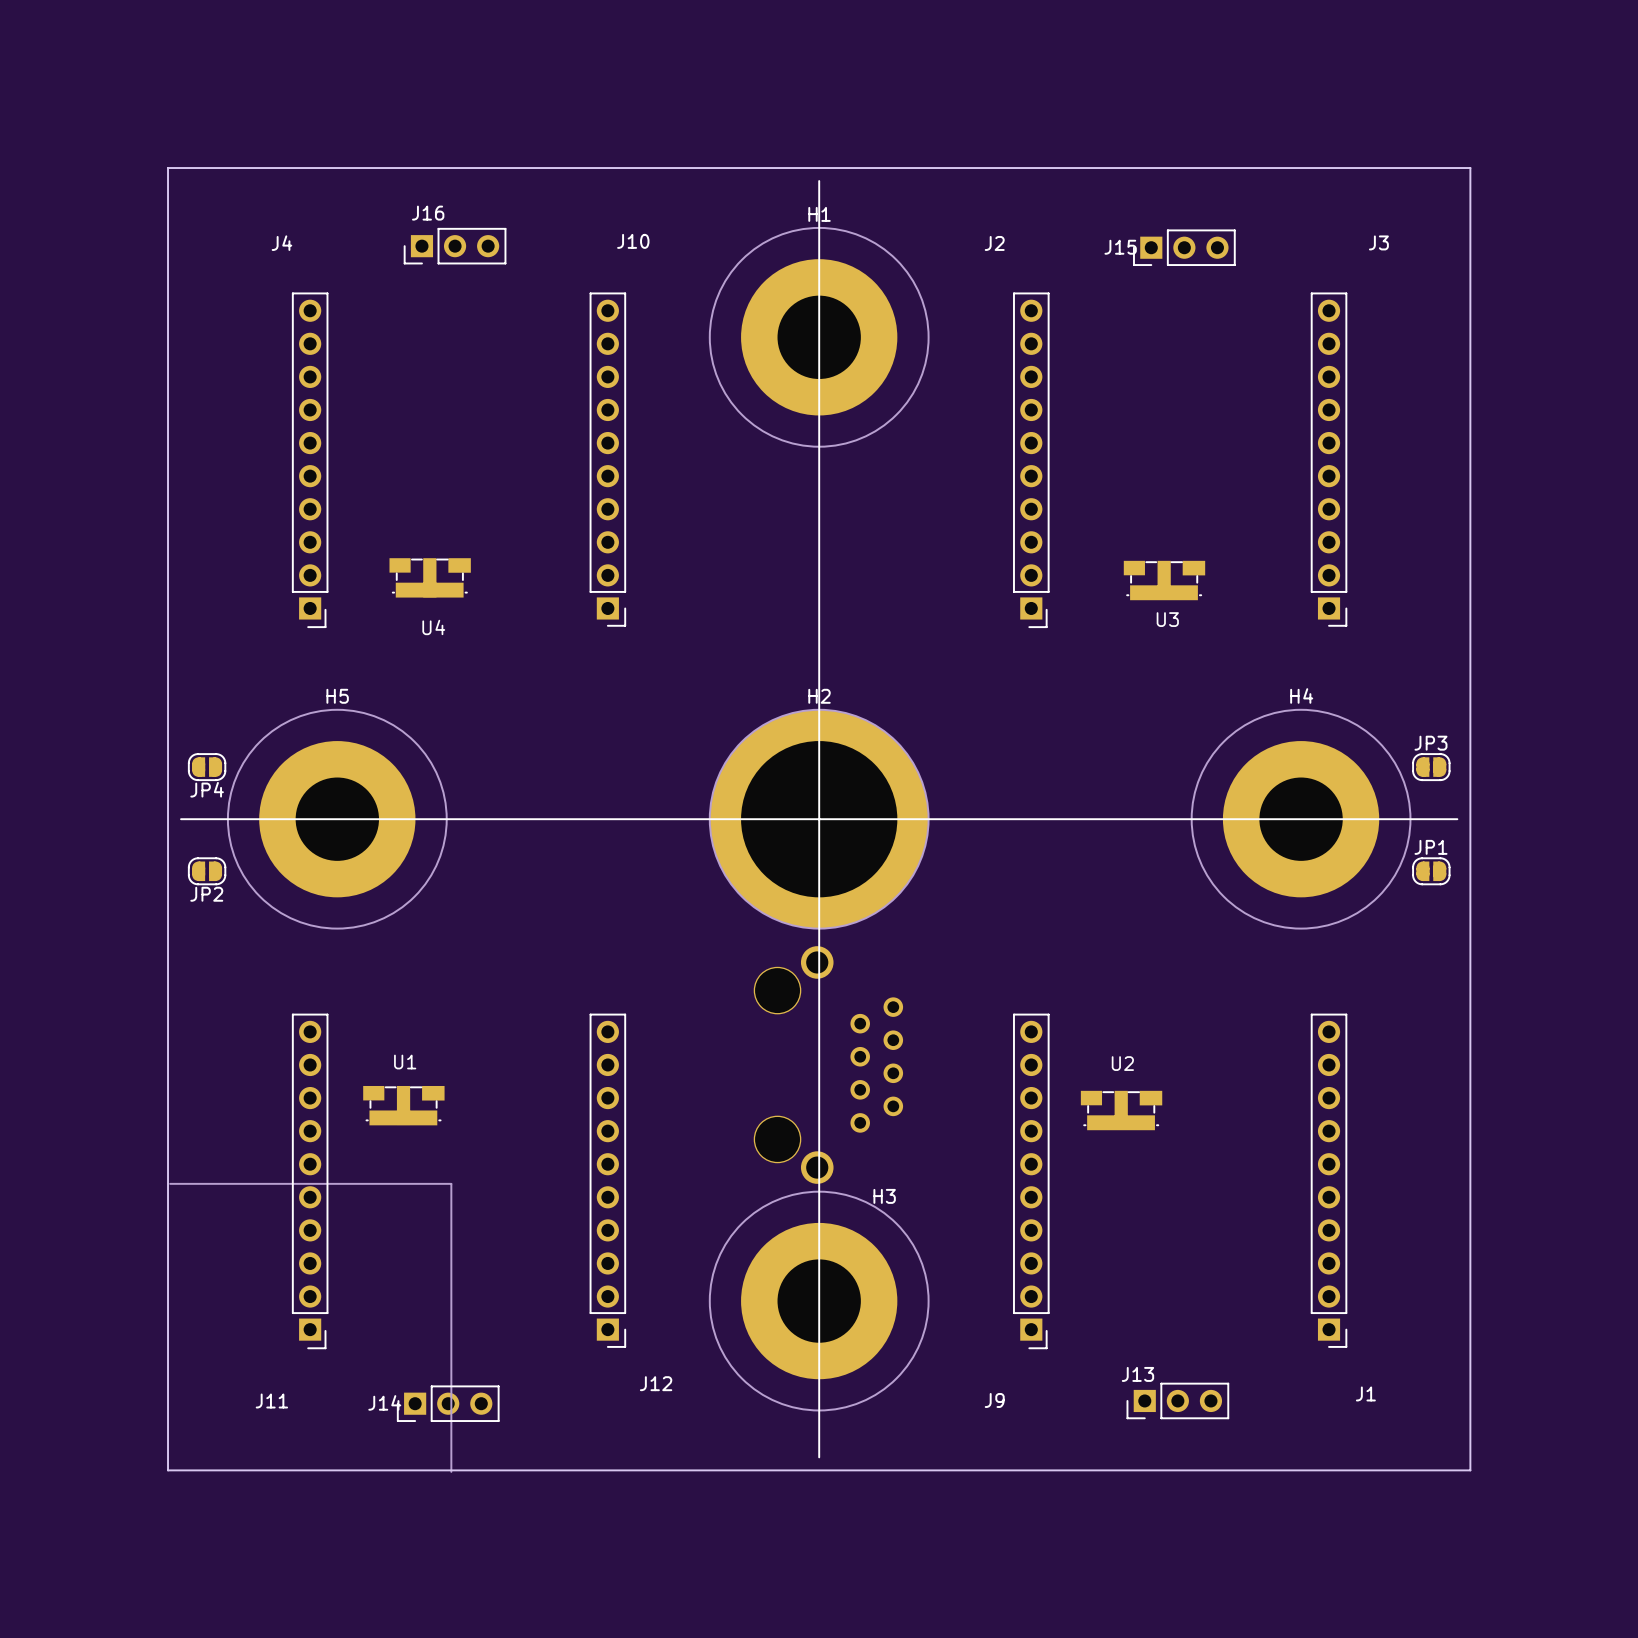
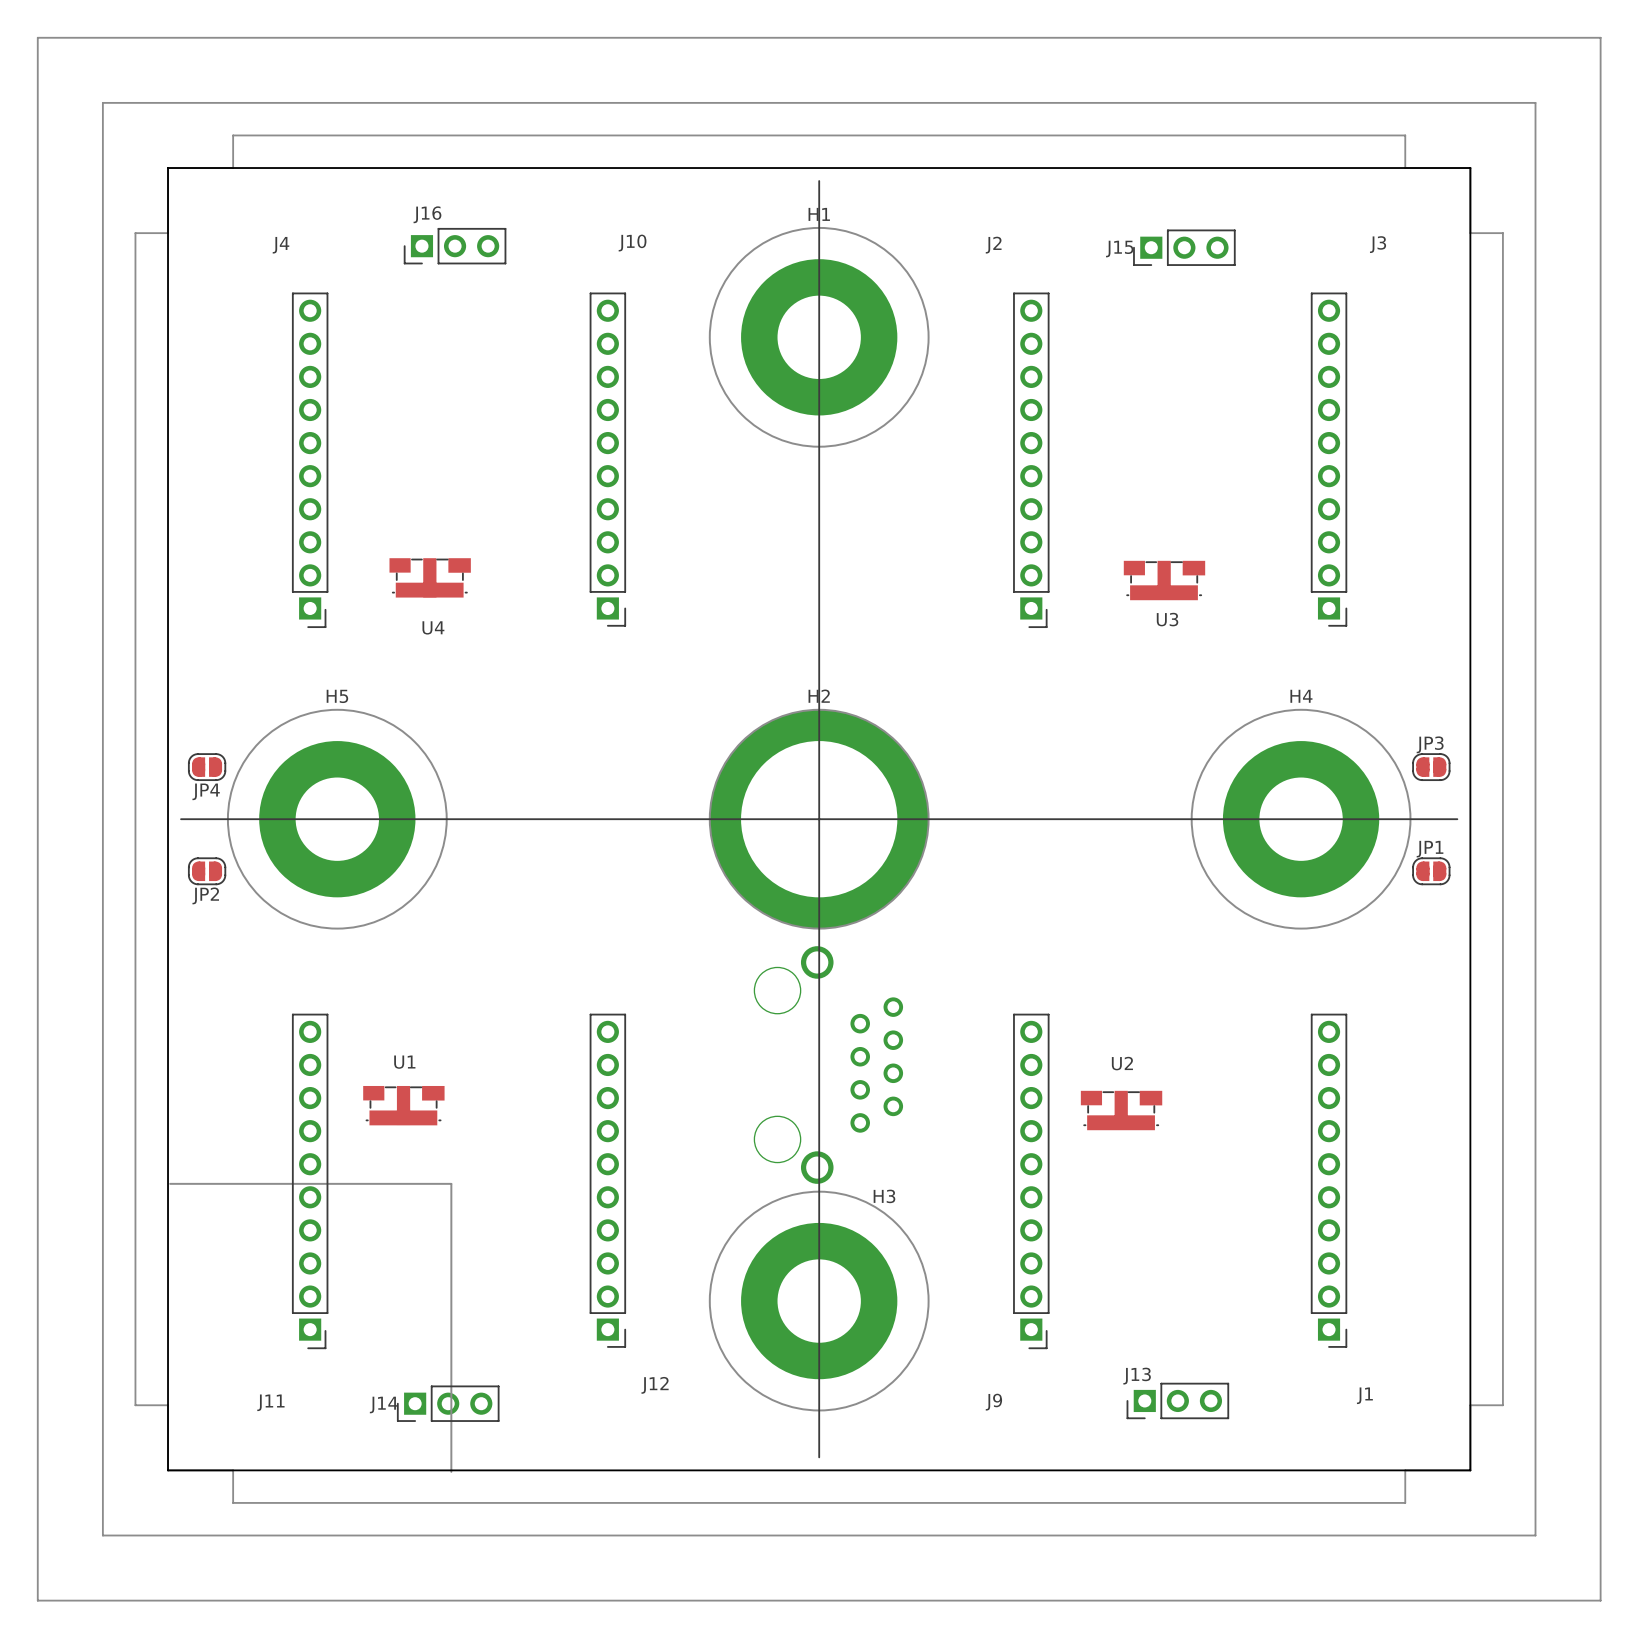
line: none -> (37, 37) (1600, 37) (1600, 1600) (37, 1600) (37, 37)
line: none -> (102, 102) (1535, 102) (1535, 1535) (102, 1535) (102, 102)
line: none -> (233, 135) (1405, 135) (1405, 168) (1470, 168) (1470, 233) (1502, 233) (1502, 1405) (1470, 1405) (1470, 1470) (1405, 1470) (1405, 1502) (233, 1502) (233, 1470) (168, 1470) (168, 1405) (135, 1405) (135, 233) (168, 233) (168, 168) (233, 168) (233, 135)

